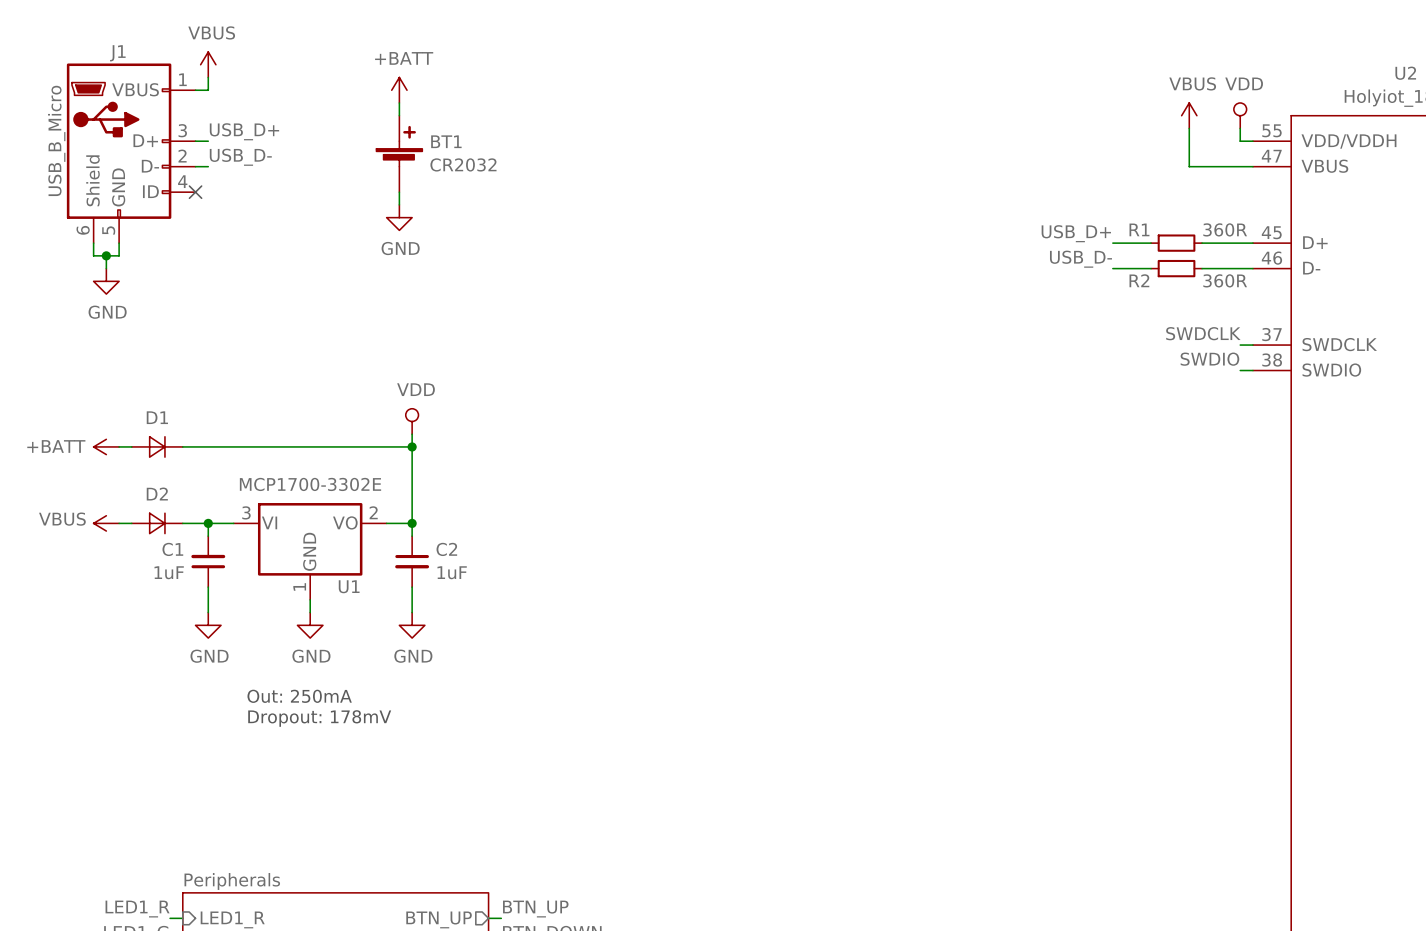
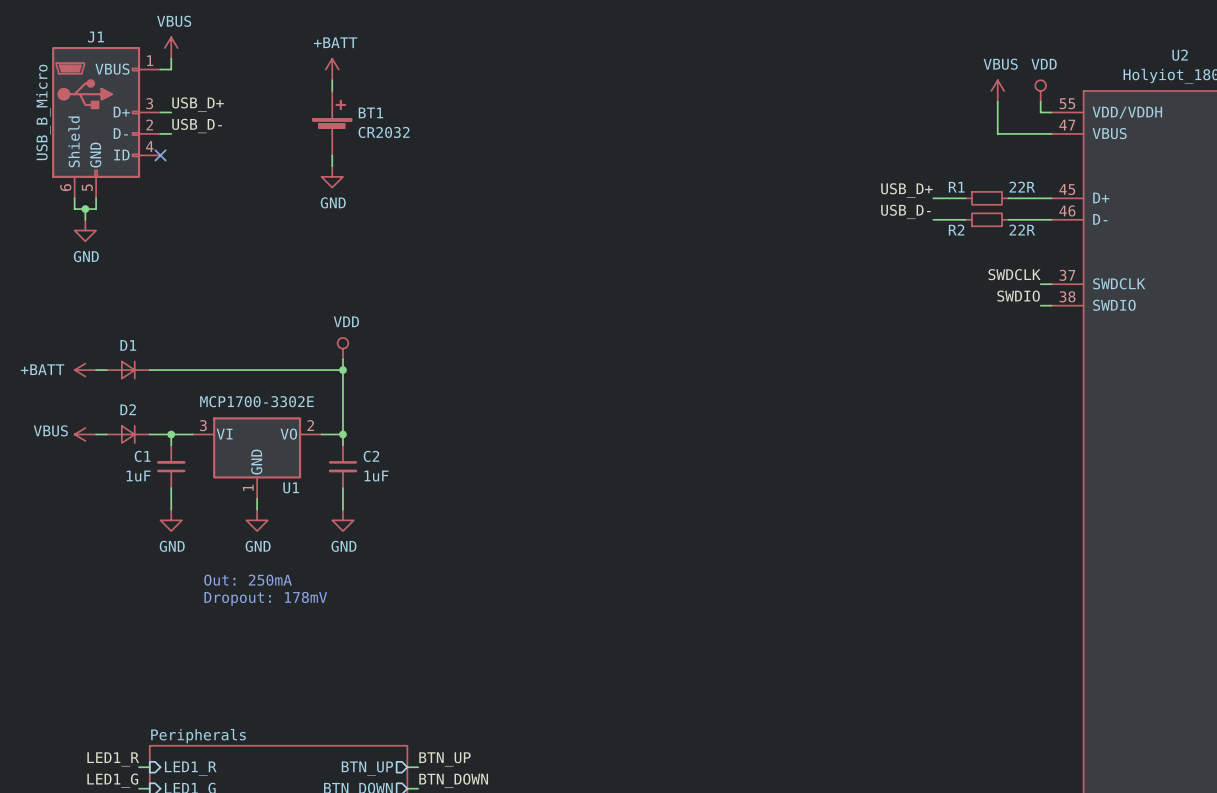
R1 value: 360R (1225, 229) -> 22R (1022, 187)
R2 value: 360R (1225, 280) -> 22R (1022, 230)

